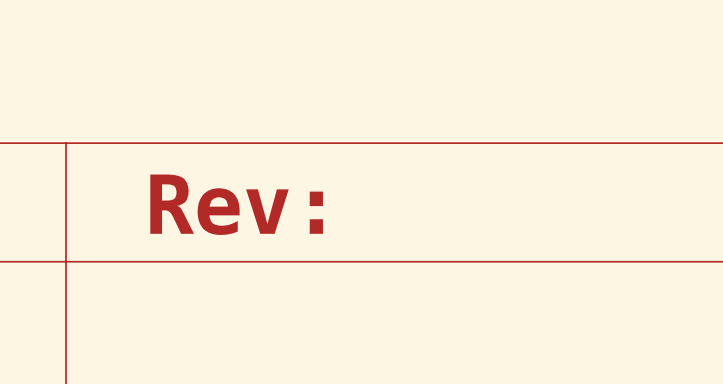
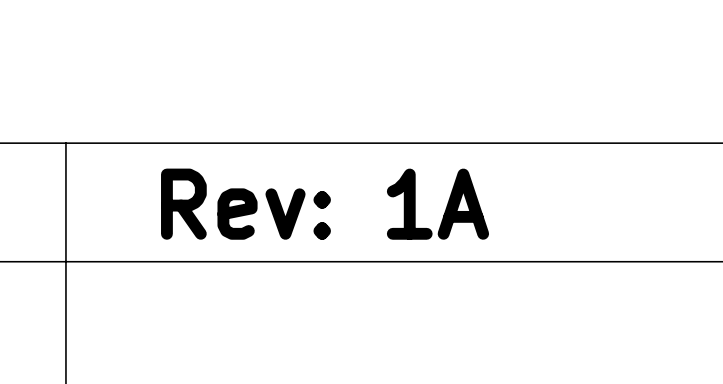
title block: Rev: (236, 204) -> Rev: 1A (325, 204)

